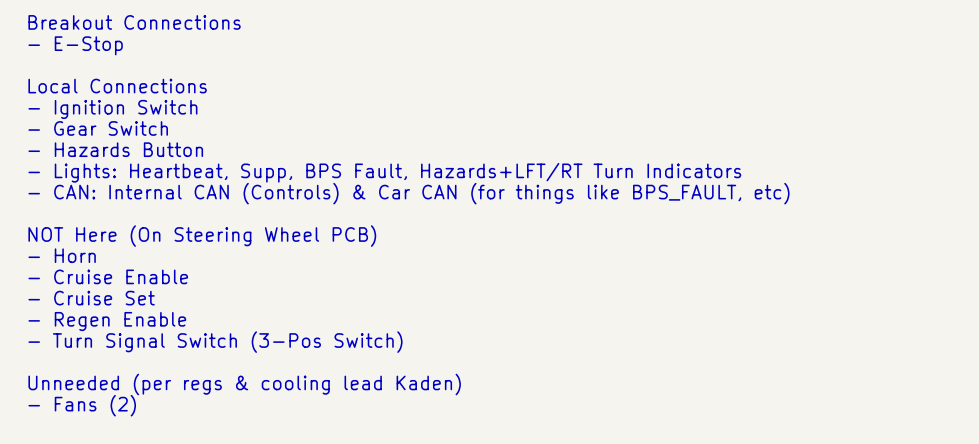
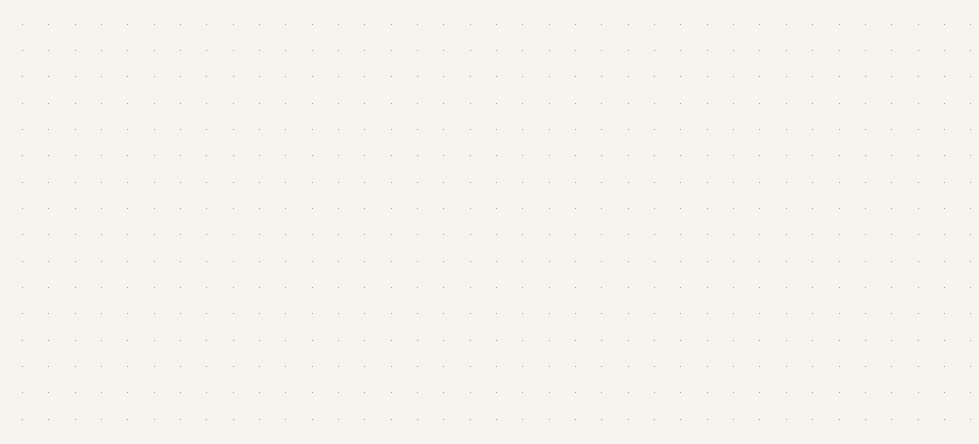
text: Breakout Connections (134, 22) -> none
text: - E-Stop (75, 45) -> none
text: Local Connections (117, 86) -> none
text: - Ignition Switch (112, 109) -> none
text: - Gear Switch (98, 128) -> none
text: - Hazards Button (115, 149) -> none
text: - Lights: Heartbeat, Supp, BPS Fault, Hazards+LFT/RT Turn Indicators (384, 172) -> none
text: - CAN: Internal CAN (Controls) & Car CAN (for things like BPS_FAULT, etc) (408, 193) -> none
text: NOT Here (On Steering Wheel PCB) (202, 236) -> none
text: - Horn (62, 255) -> none
text: - Cruise Enable (108, 276) -> none
text: - Cruise Set (91, 298) -> none
text: - Regen Enable (107, 321) -> none
text: - Turn Signal Switch (3-Pos Switch) (215, 342) -> none
text: Unneeded (per regs & cooling lead Kaden) (244, 384) -> none
text: - Fans (2) (82, 405) -> none

